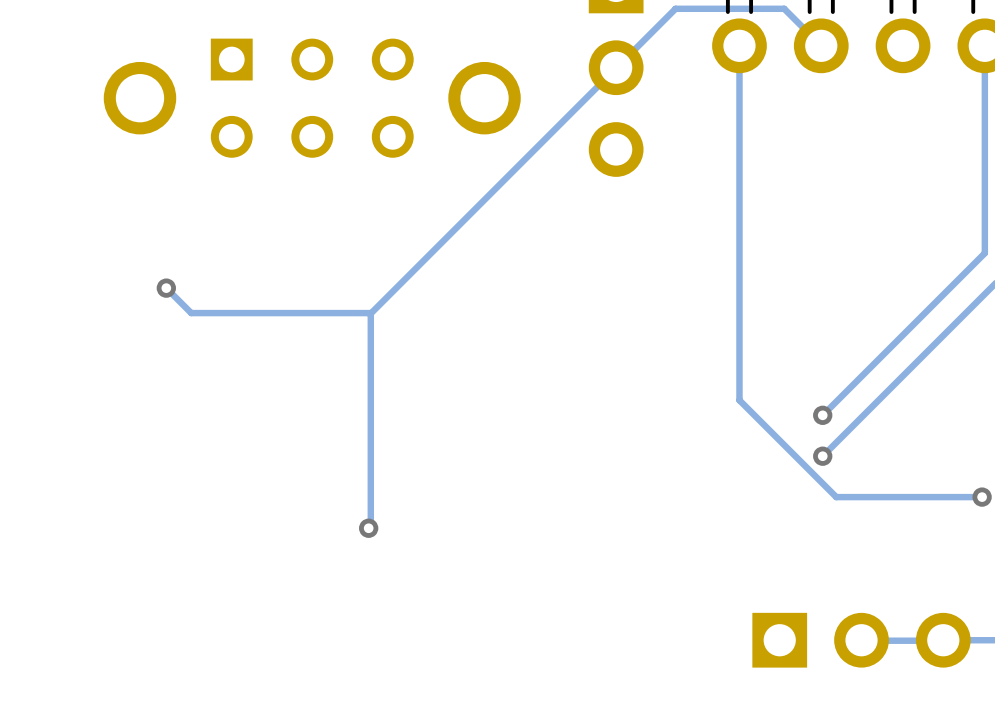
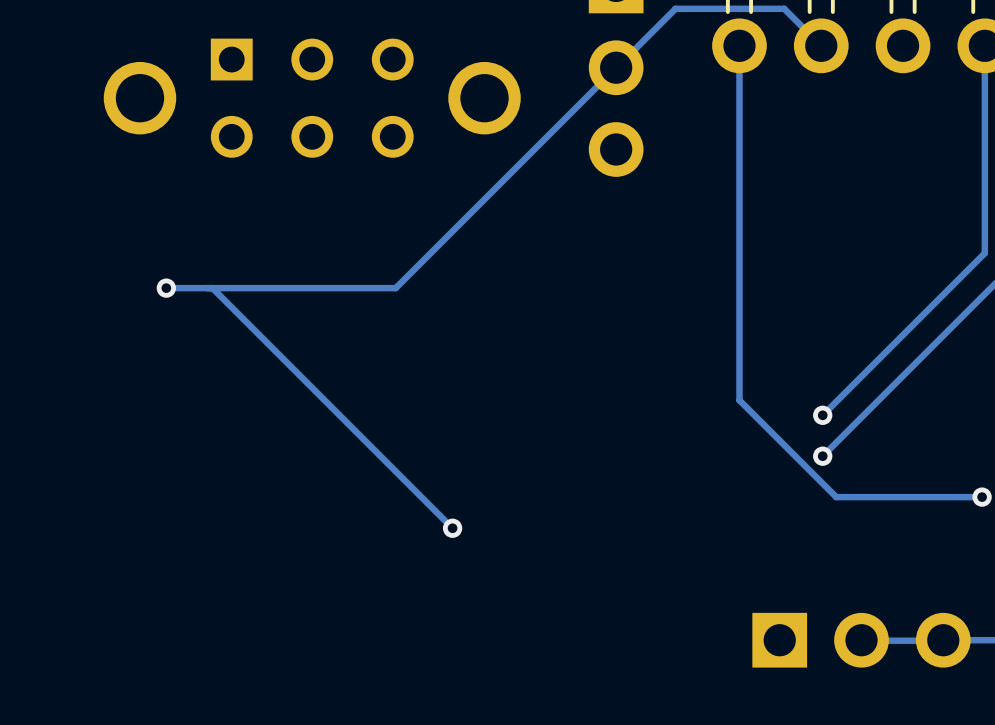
track: (616, 67) (370, 313) -> (616, 67) (395, 288) (166, 288)
track: (166, 288) (191, 313) (370, 313) -> none
track: none -> (212, 288) (452, 528)
track: (370, 313) (370, 526) (368, 528) -> none
via position: (368, 528) -> (452, 528)

